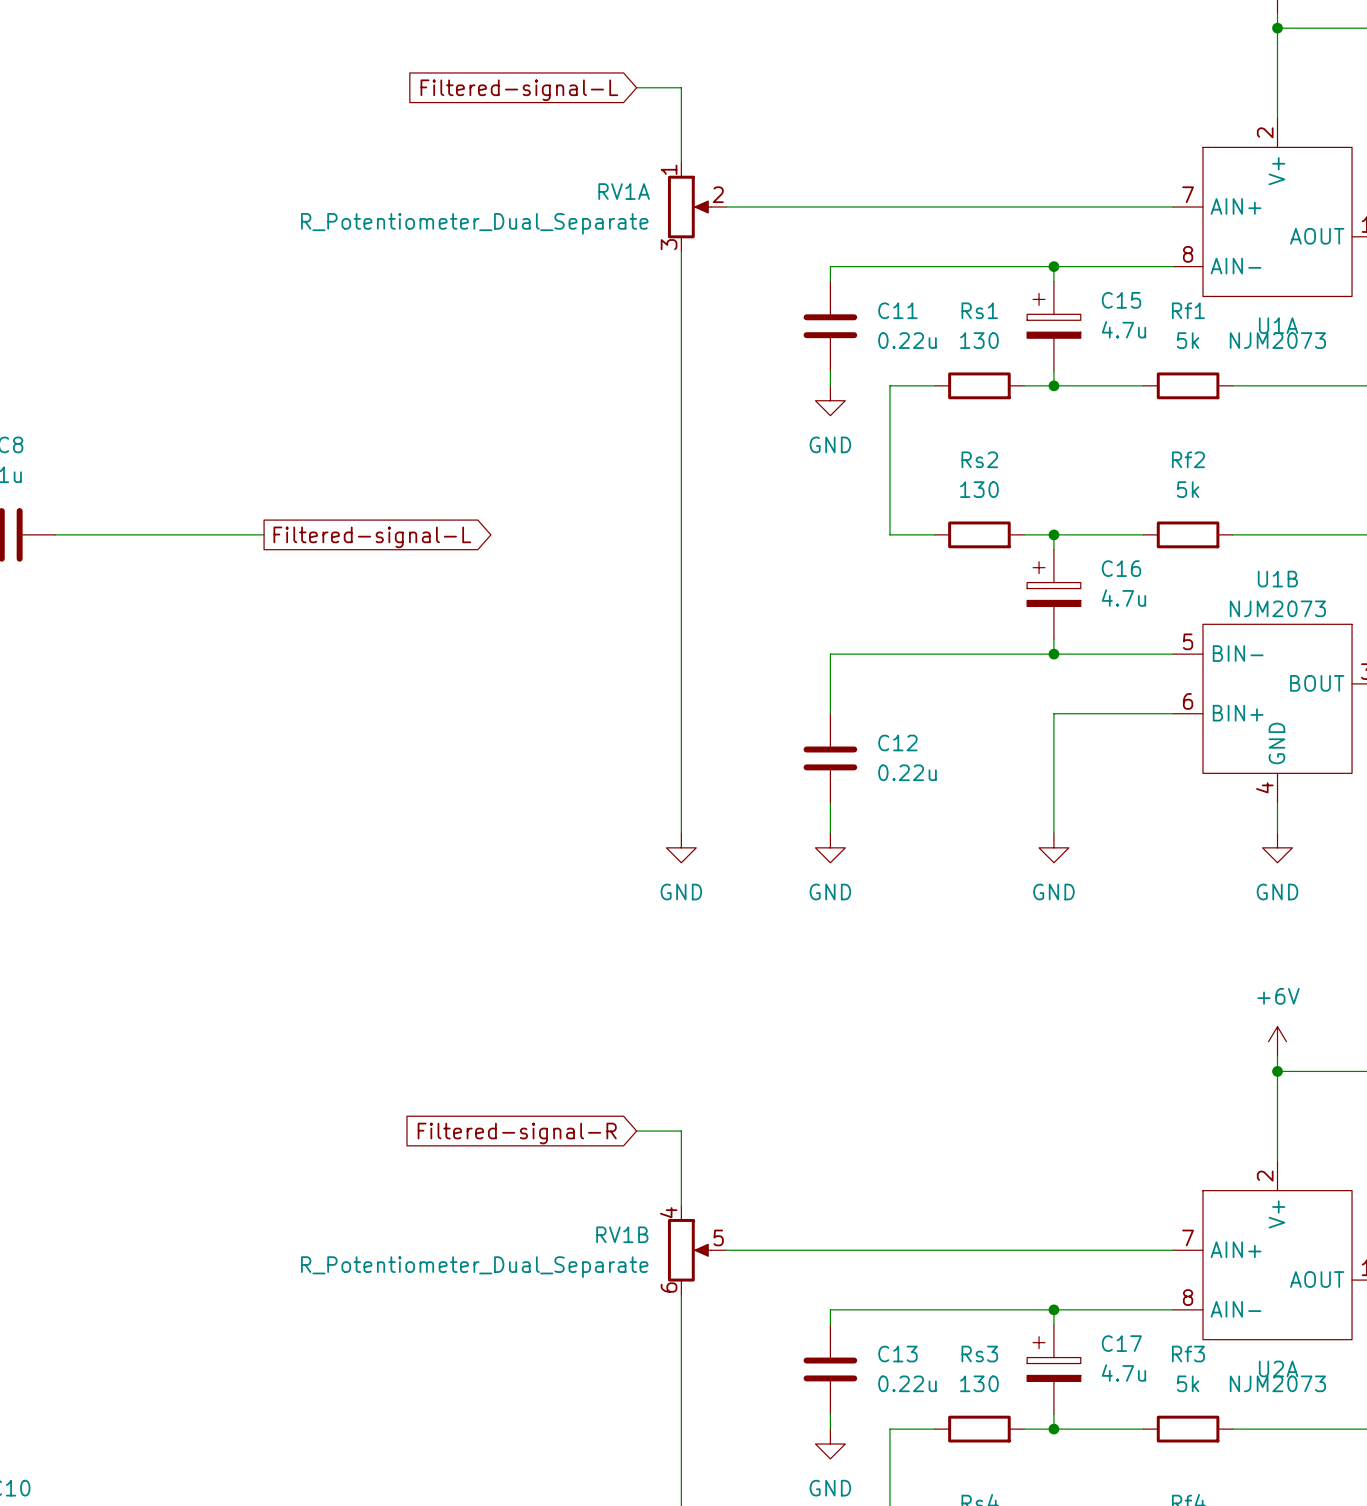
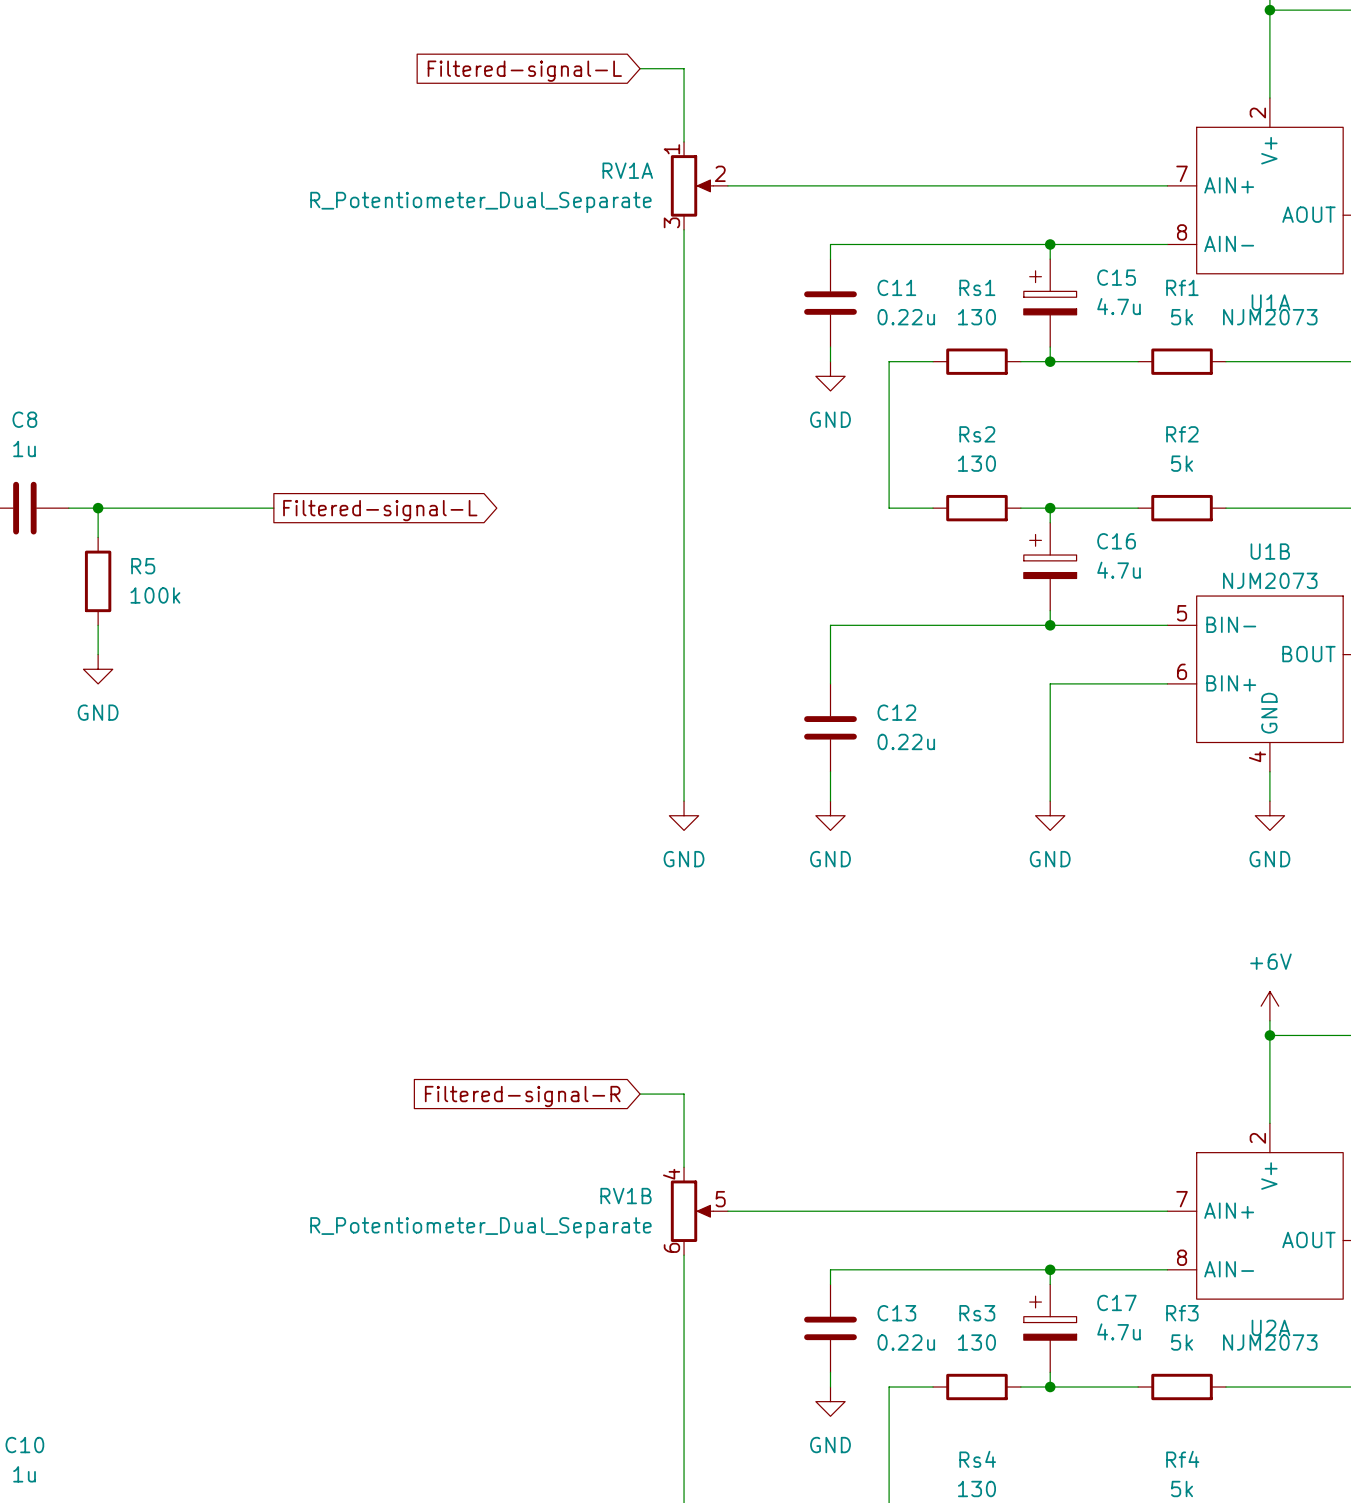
wire: none -> (98, 508) (98, 537)
junction: none -> (98, 508)
R5: none -> 100k (98, 581)
wire: none -> (98, 625) (98, 654)
power symbol: none -> GND (98, 669)

